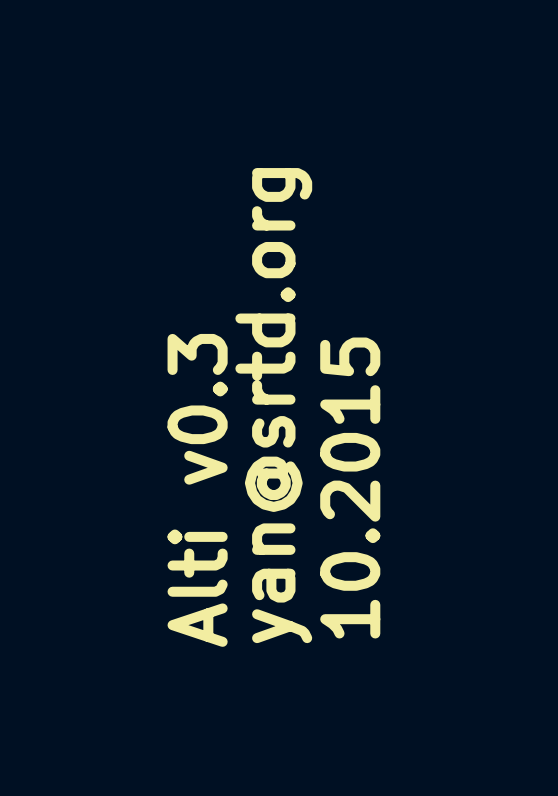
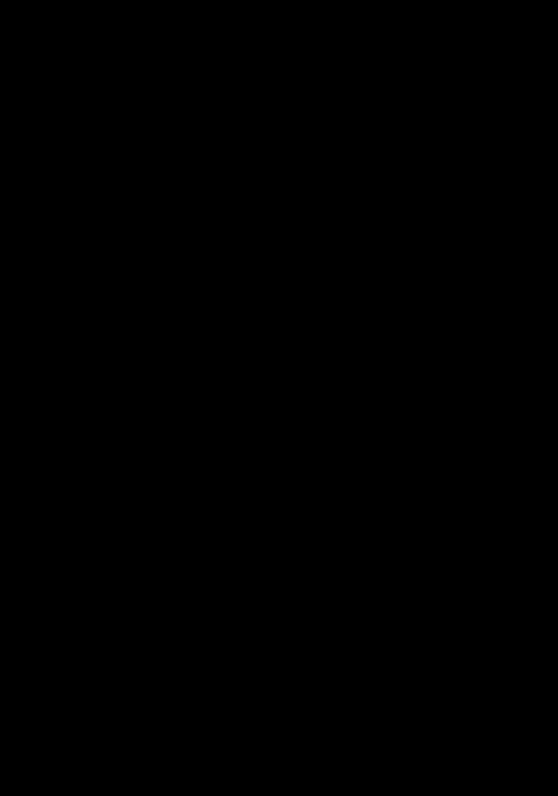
text: yan@srtd.org (273, 405) -> none
text: 10.2015 (350, 488) -> none
text: Alti v0.3 (197, 490) -> none

